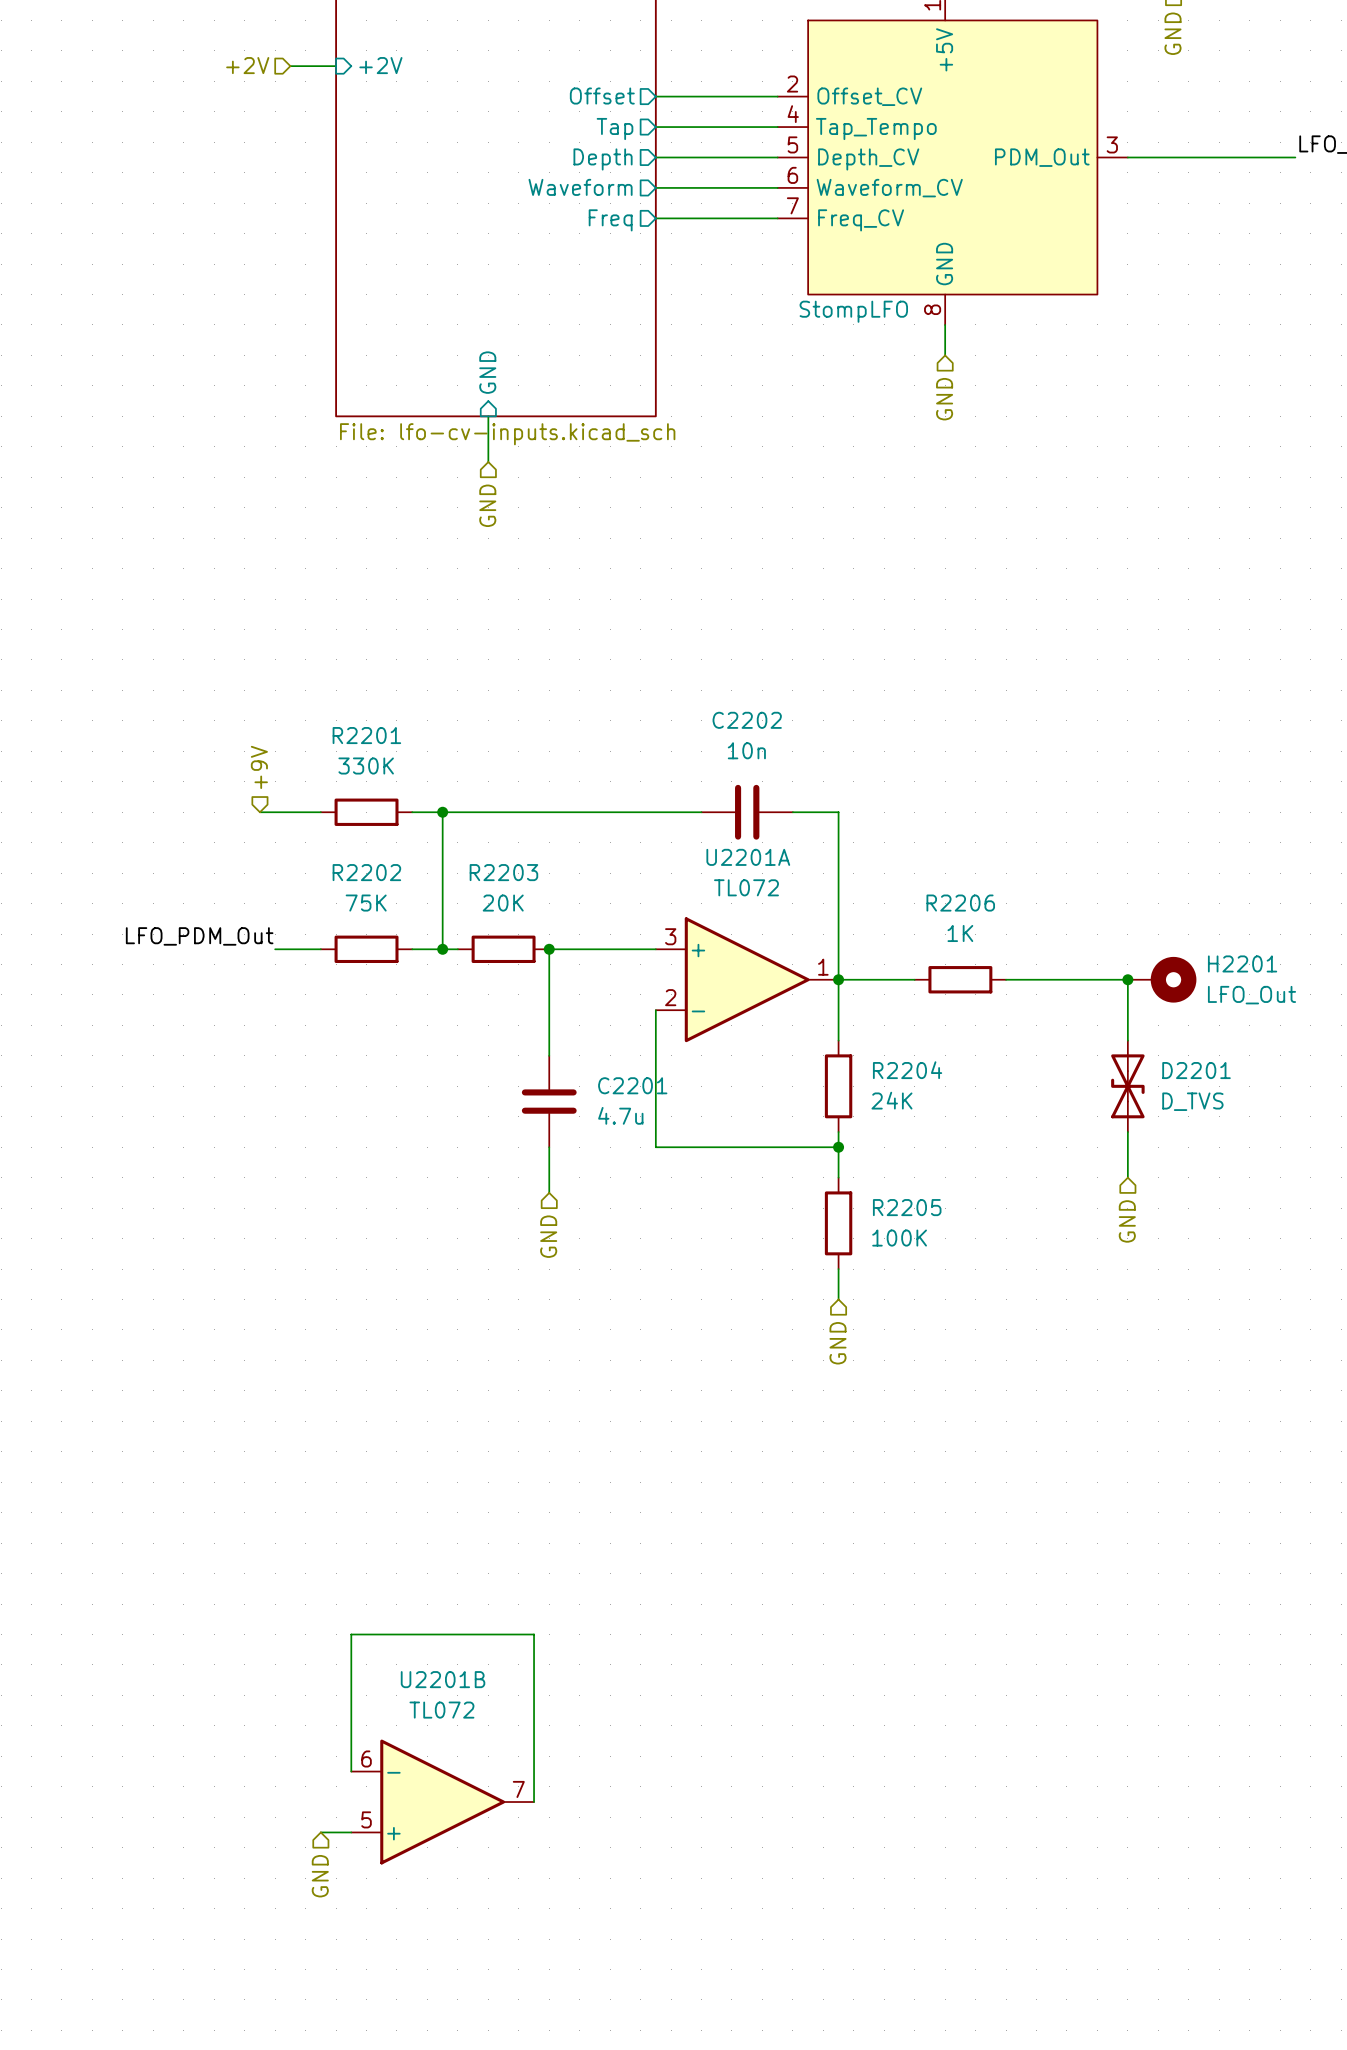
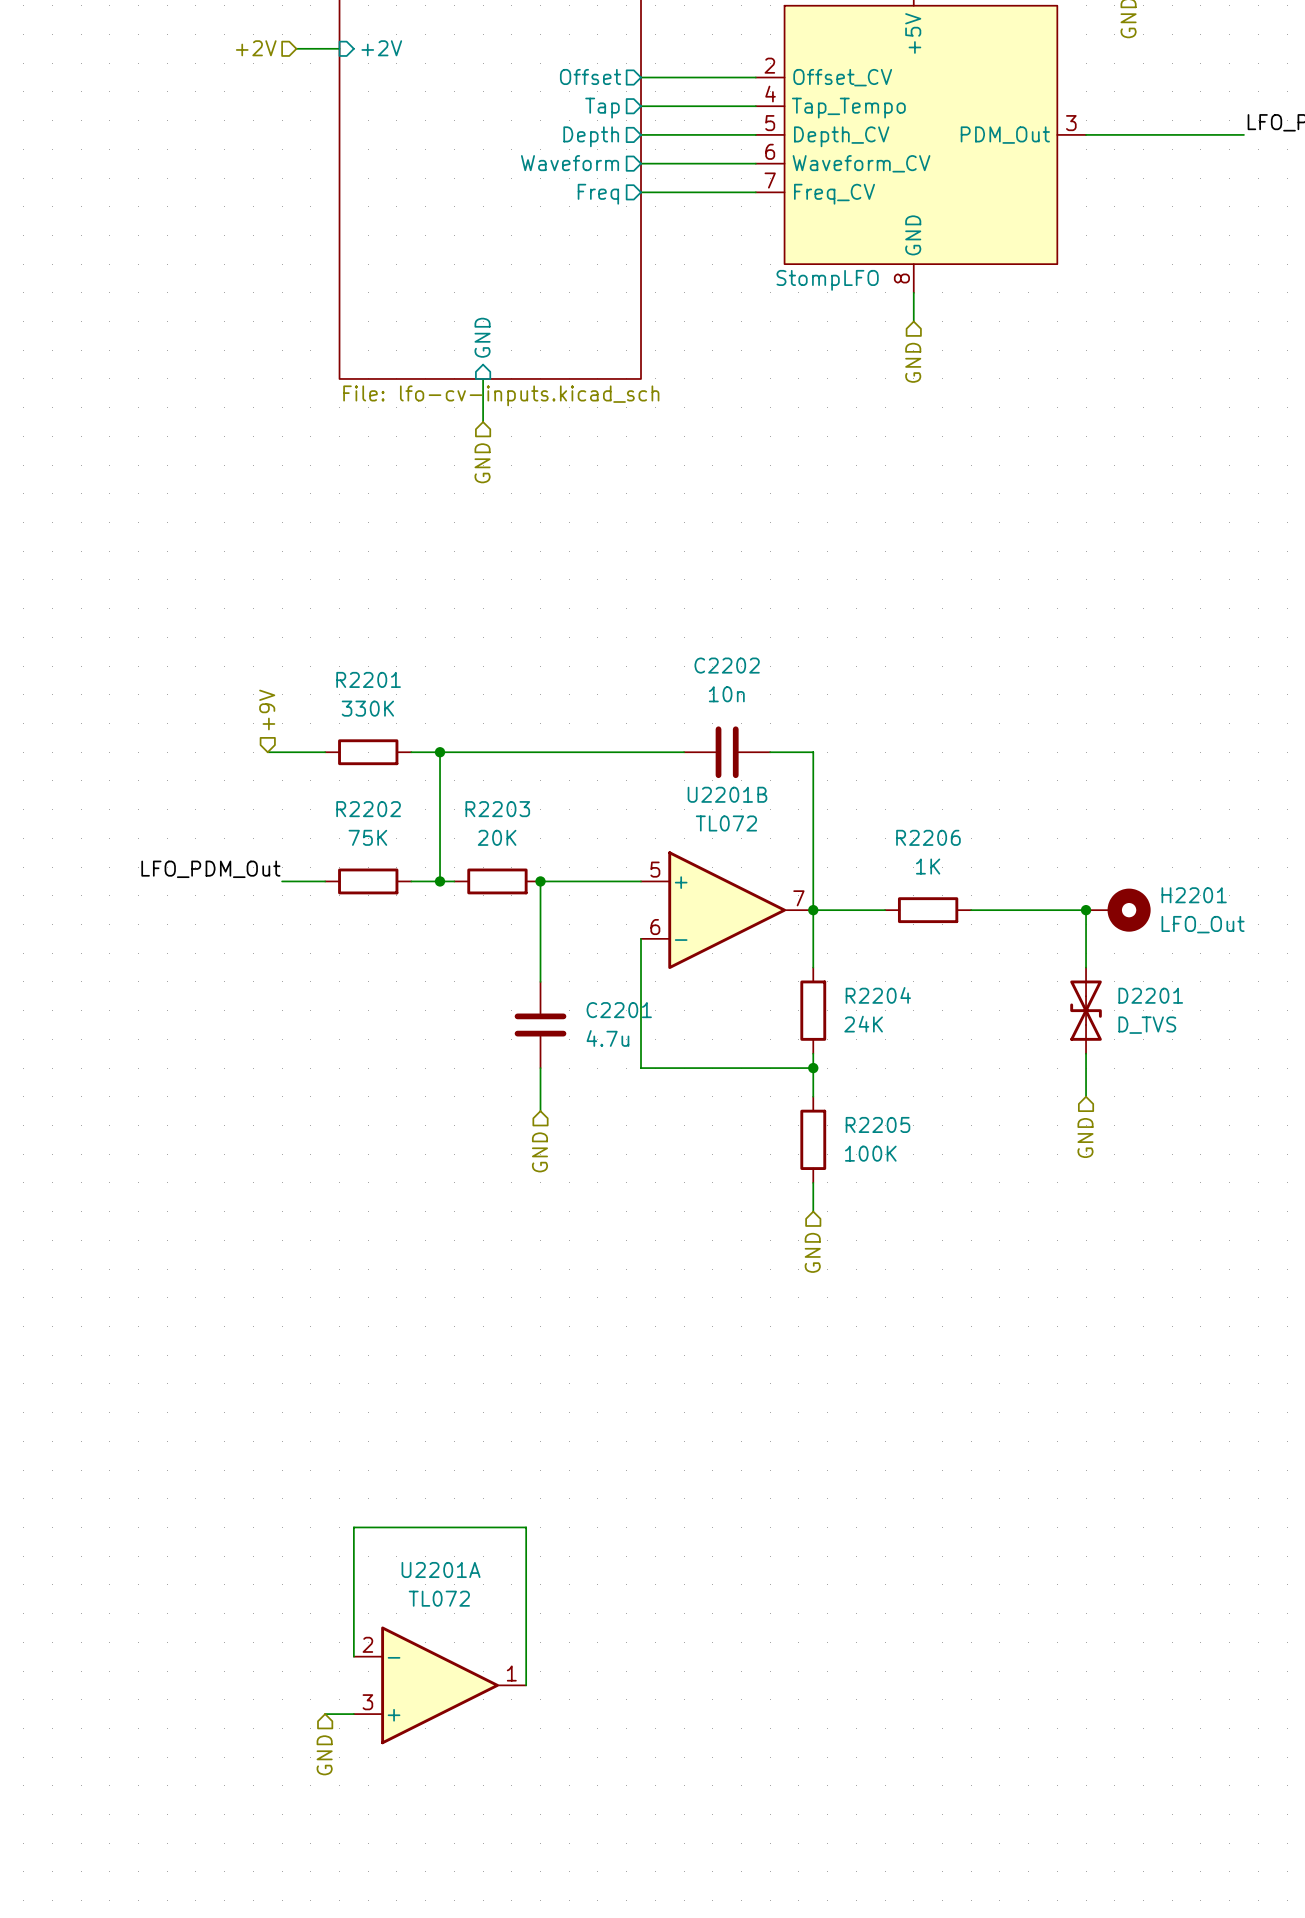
U2201A flip: as is (747, 979) -> up-down (440, 1685)
U2201A position: (747, 979) -> (440, 1685)
U2201B flip: as is (442, 1802) -> up-down (727, 910)
U2201B position: (442, 1802) -> (727, 910)

